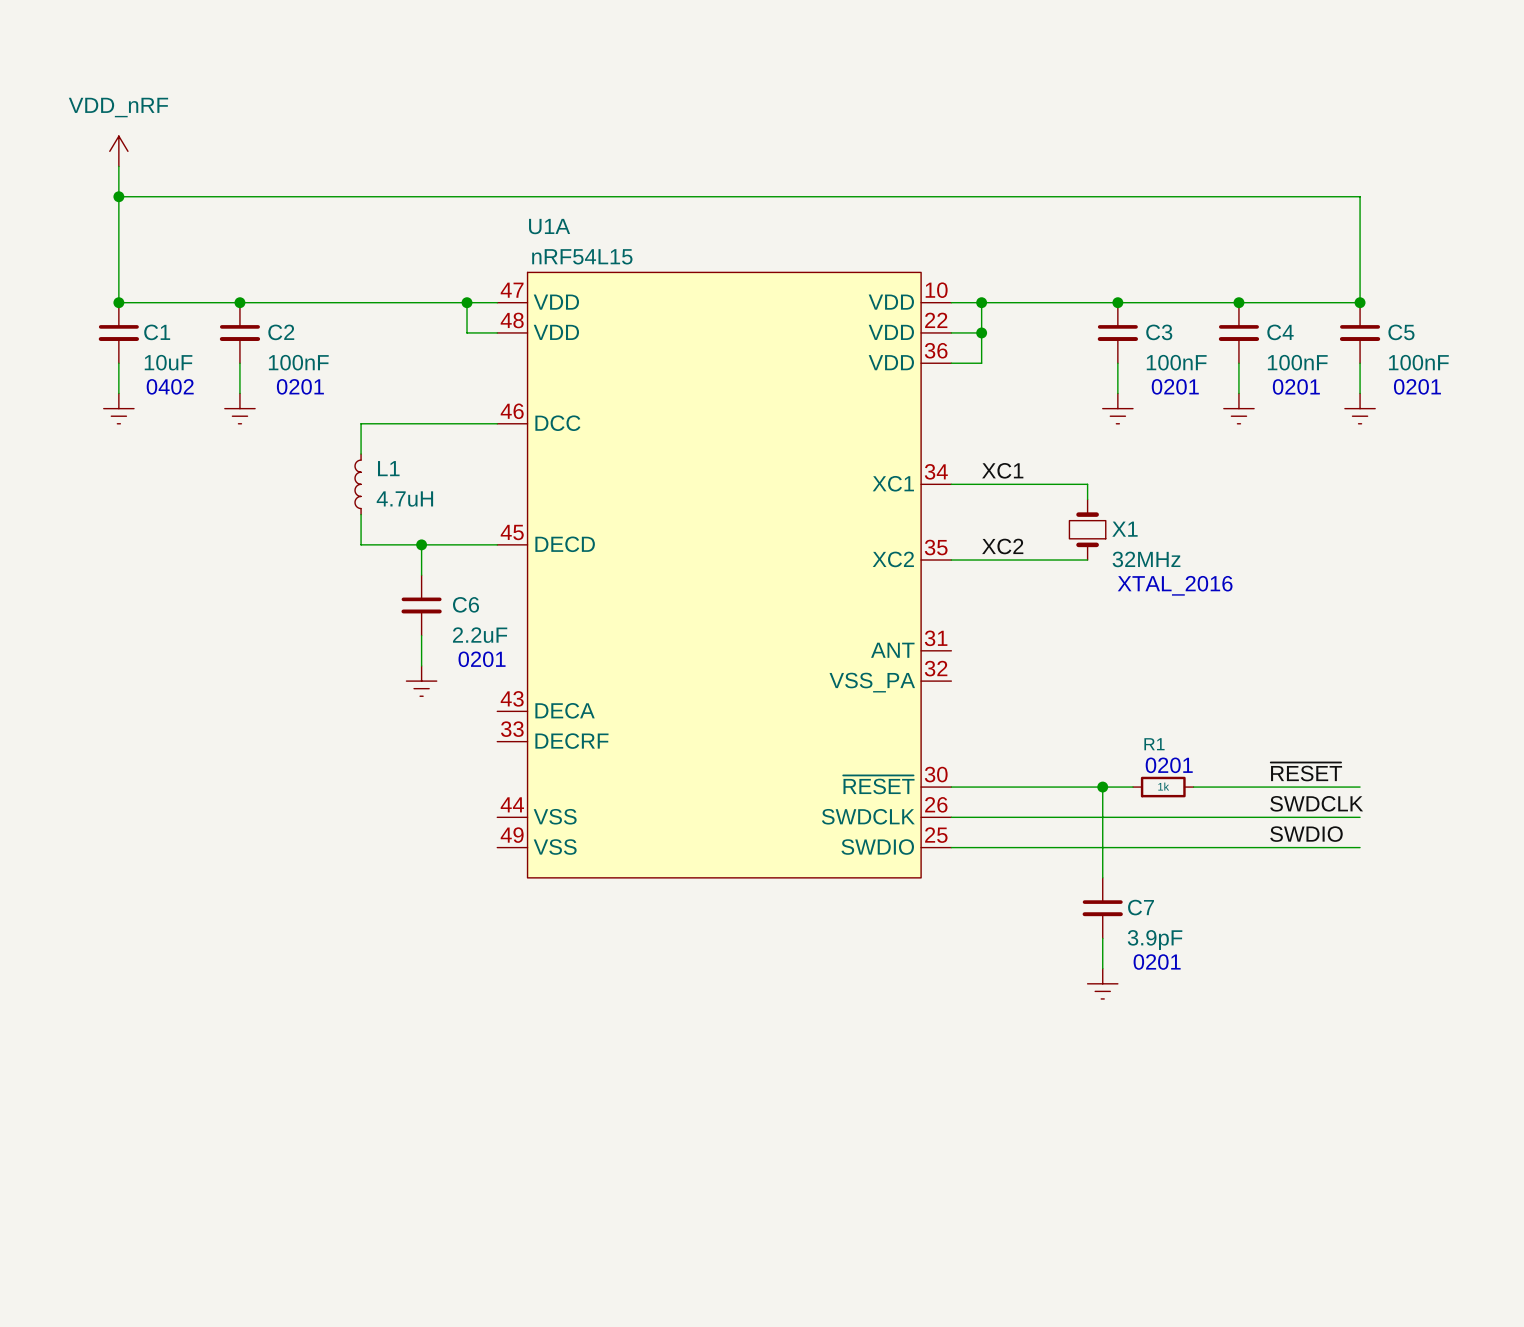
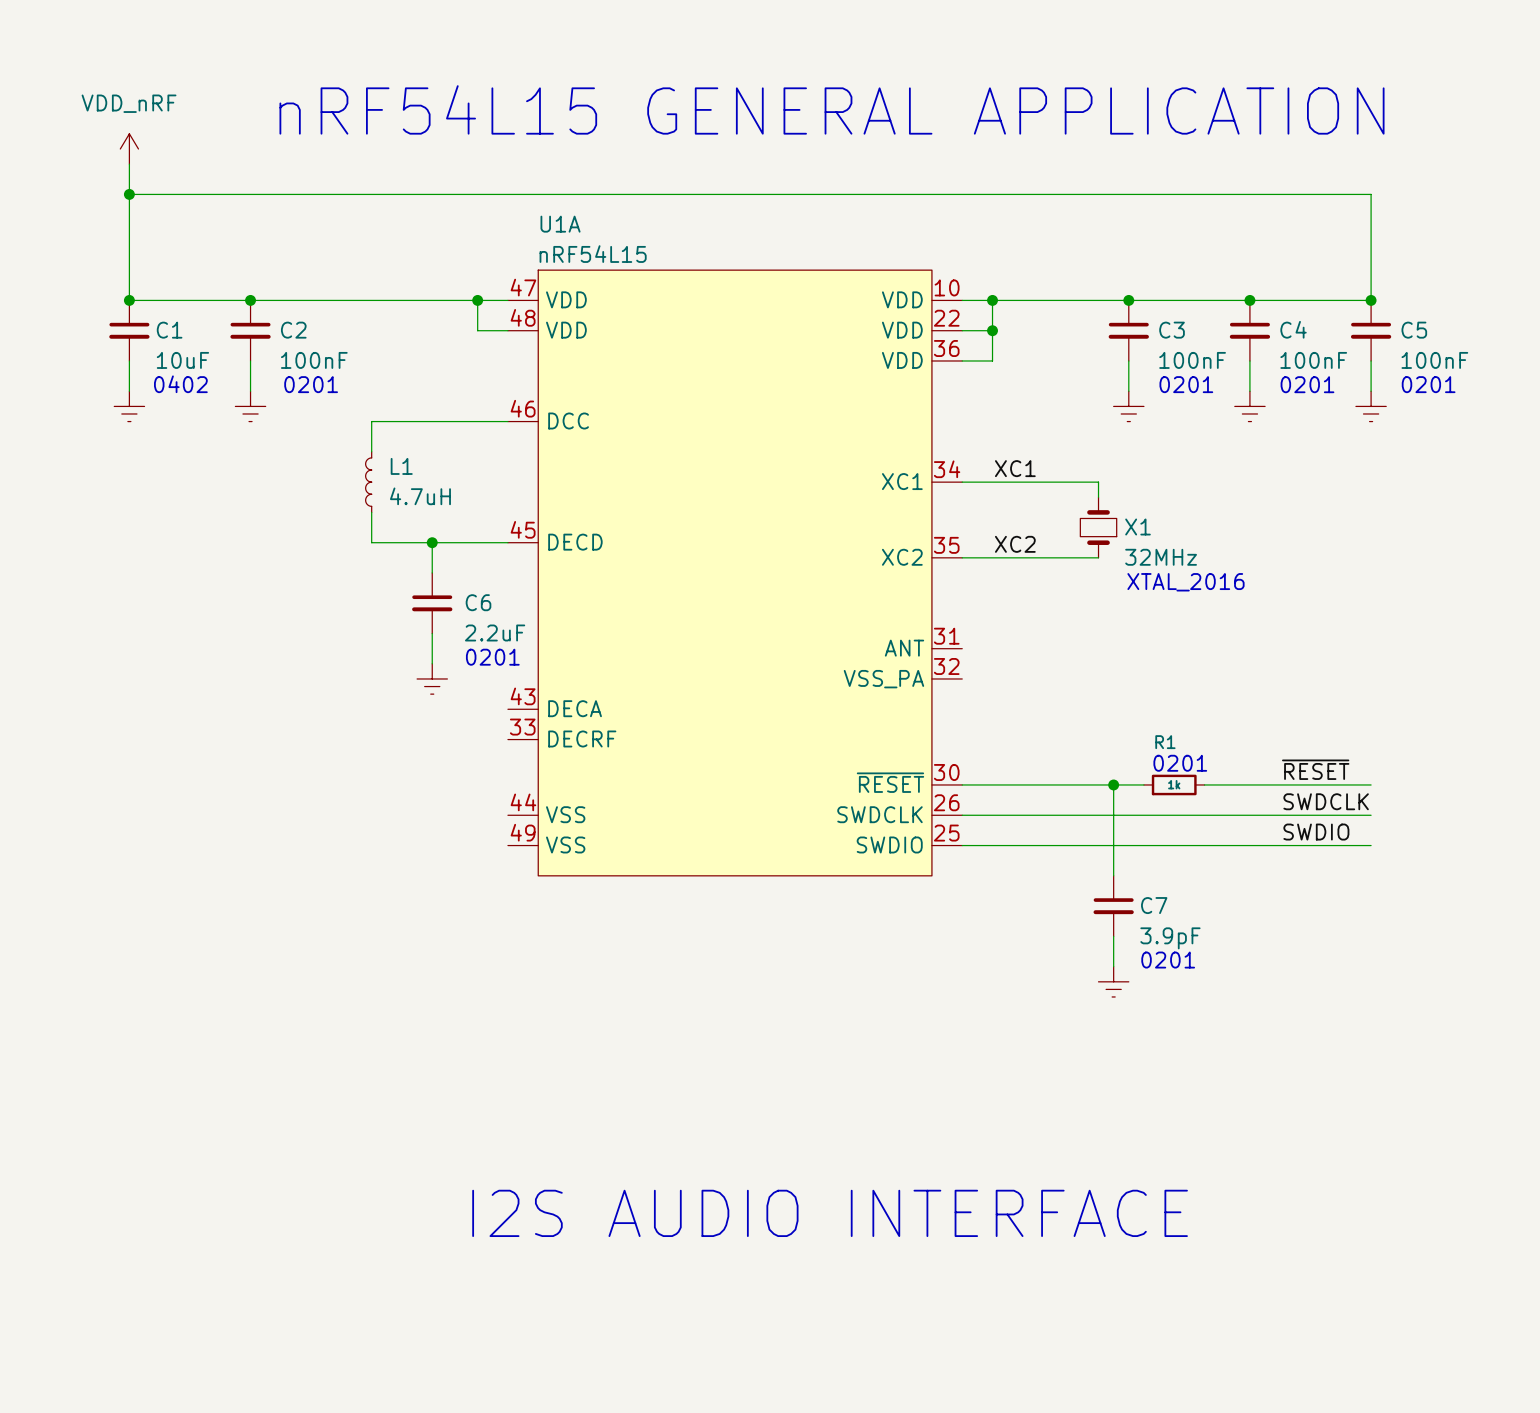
text: none -> nRF54L15 GENERAL APPLICATION (832, 109)
text: none -> I2S AUDIO INTERFACE (830, 1213)

